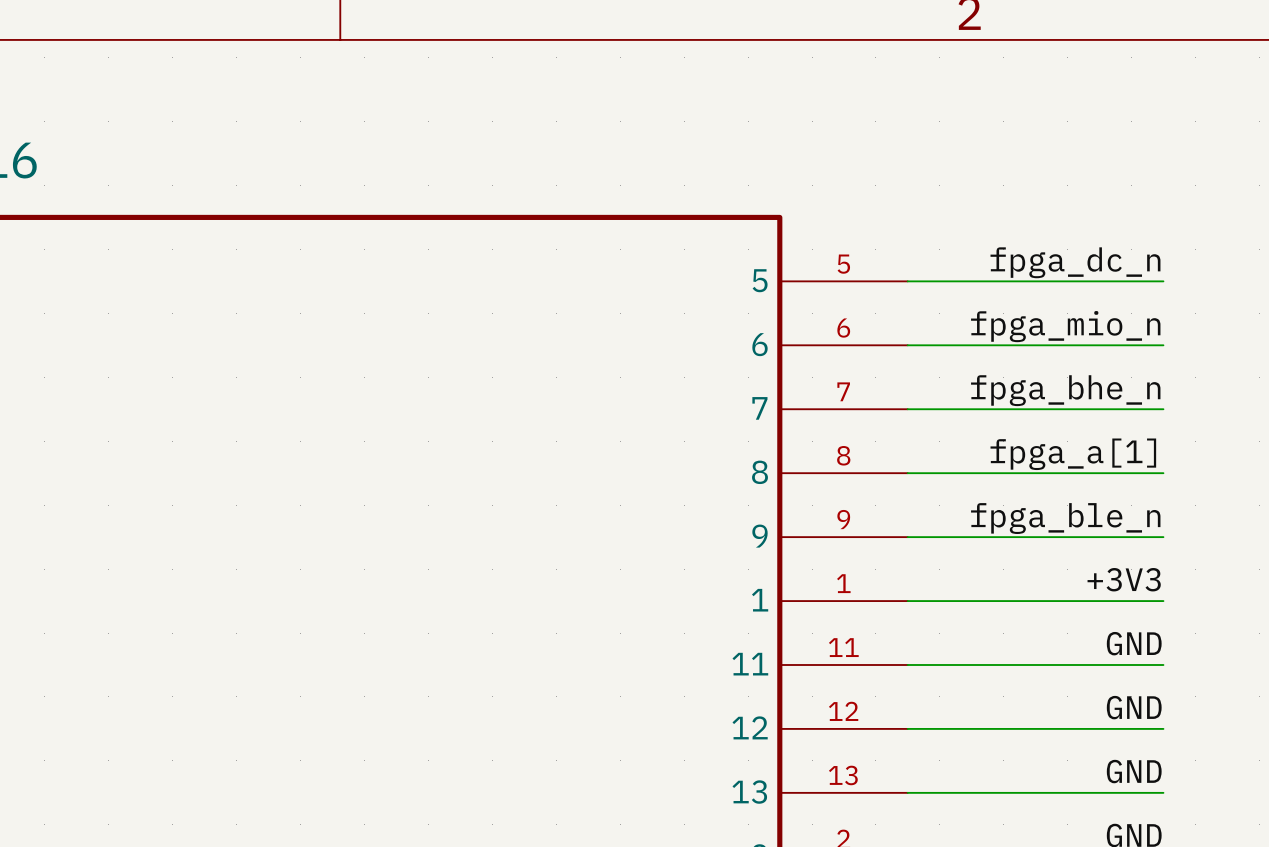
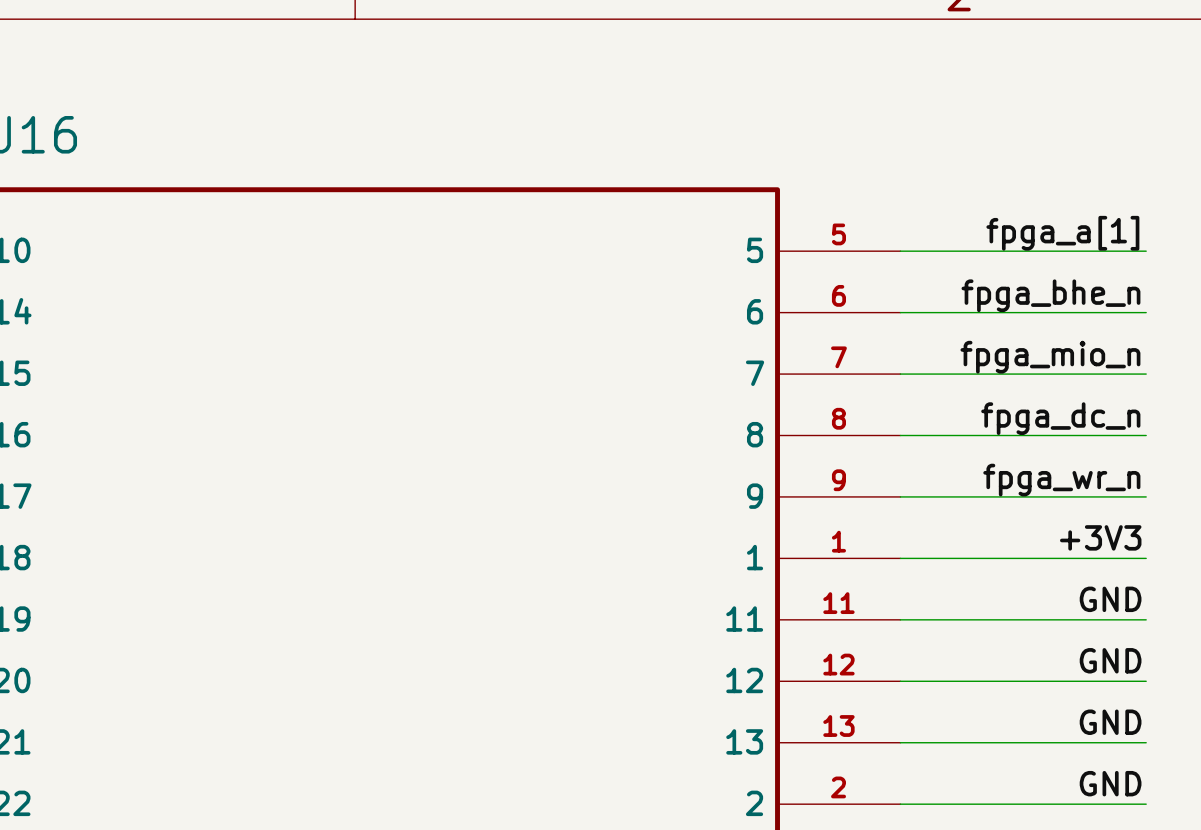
label: fpga_dc_n (1075, 262) -> fpga_a[1] (1062, 233)
label: fpga_mio_n (1065, 326) -> fpga_bhe_n (1050, 295)
label: fpga_bhe_n (1065, 390) -> fpga_mio_n (1050, 357)
label: fpga_a[1] (1073, 454) -> fpga_dc_n (1060, 418)
label: fpga_ble_n (1065, 518) -> fpga_wr_n (1061, 480)

